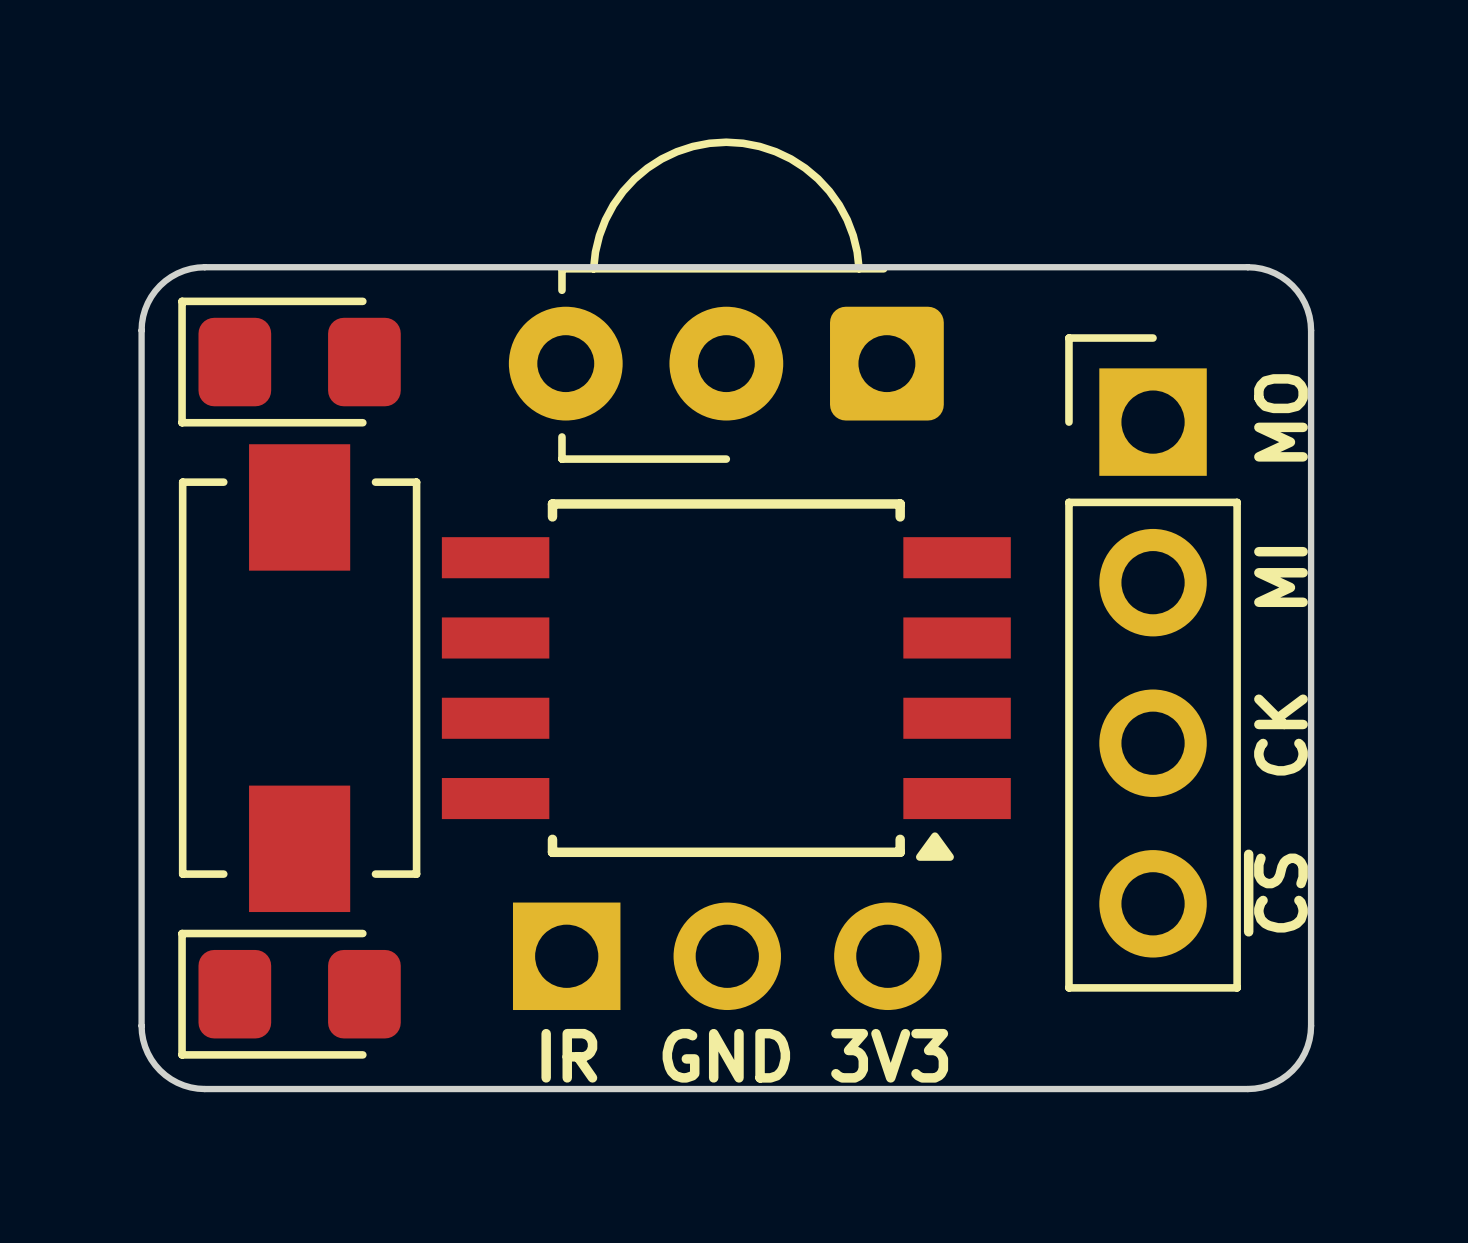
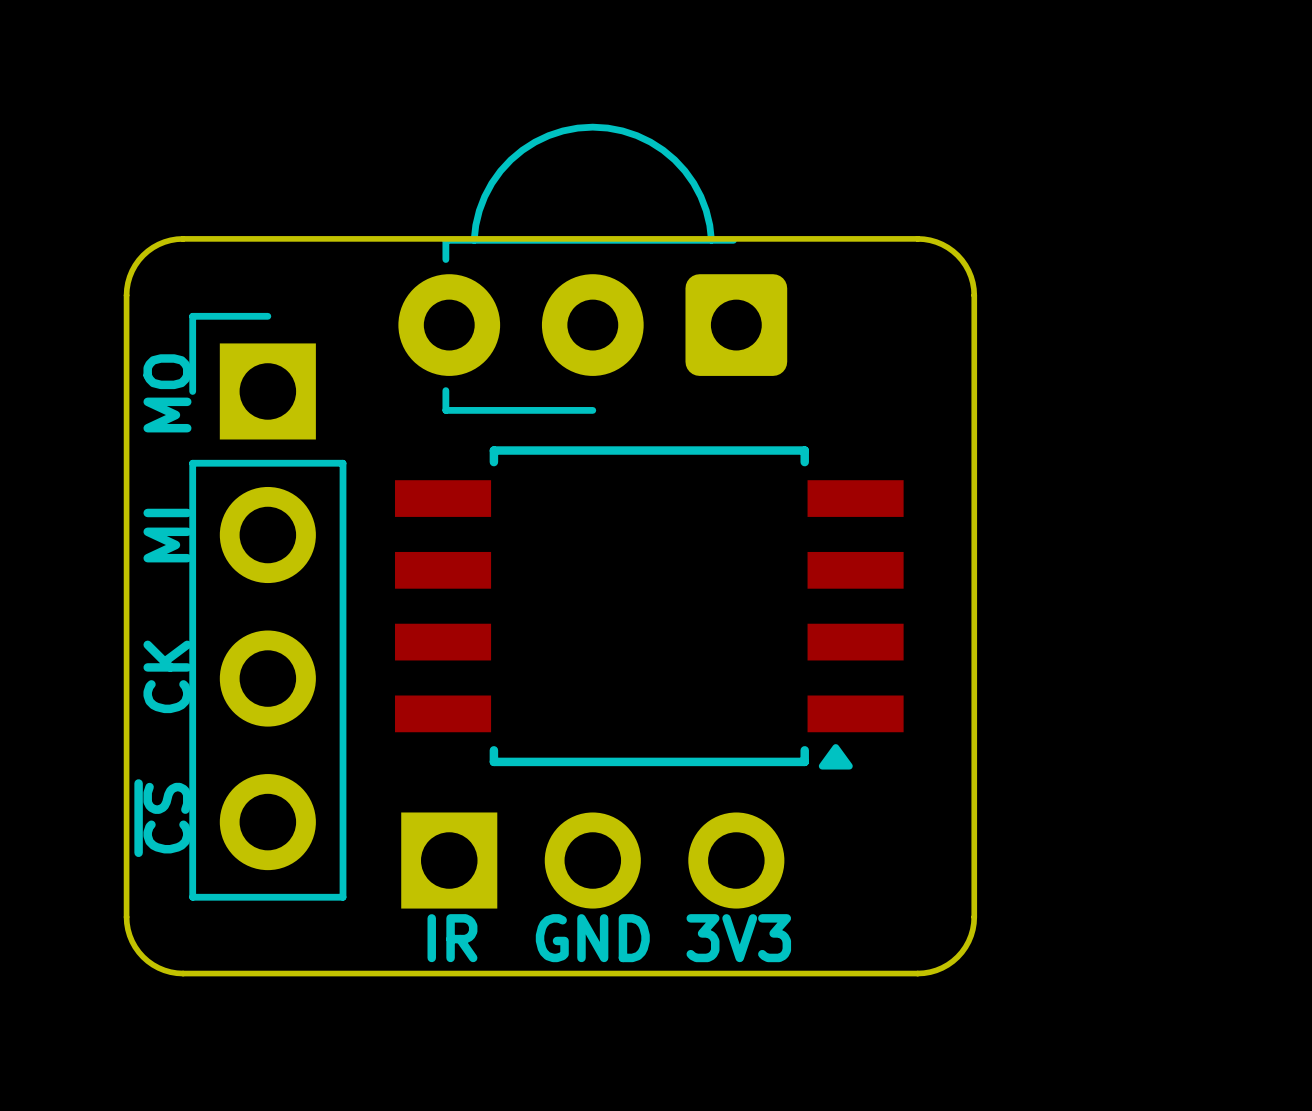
board edge: (1026, 267) (1261, 268) (1281, 276) (1297, 291) (1307, 309) (1311, 330) (1311, 1025) (1307, 1046) (1301, 1059) (1287, 1075) (1275, 1082) (1254, 1088) (1026, 1089) -> (917, 238) (942, 244) (957, 255) (968, 270) (974, 295) (973, 923) (965, 947) (952, 961) (936, 970) (917, 973)
part position: (726, 300) -> (592, 268)
part: (289, 362) -> none
text position: MO (1280, 417) -> MO (167, 393)
part footprint: [178, 444, 421, 913] -> [189, 312, 347, 901]
text position: MI (1280, 576) -> MI (167, 535)
part: (1153, 662) -> none
text position: CK (1280, 735) -> CK (167, 676)
text position: ~{CS} (1275, 893) -> ~{CS} (162, 818)
part position: (727, 956) -> (592, 860)
part: (289, 994) -> none
text position: IR (569, 1055) -> IR (452, 938)
text position: GND (726, 1055) -> GND (592, 938)
text position: 3V3 (889, 1055) -> 3V3 (738, 938)

